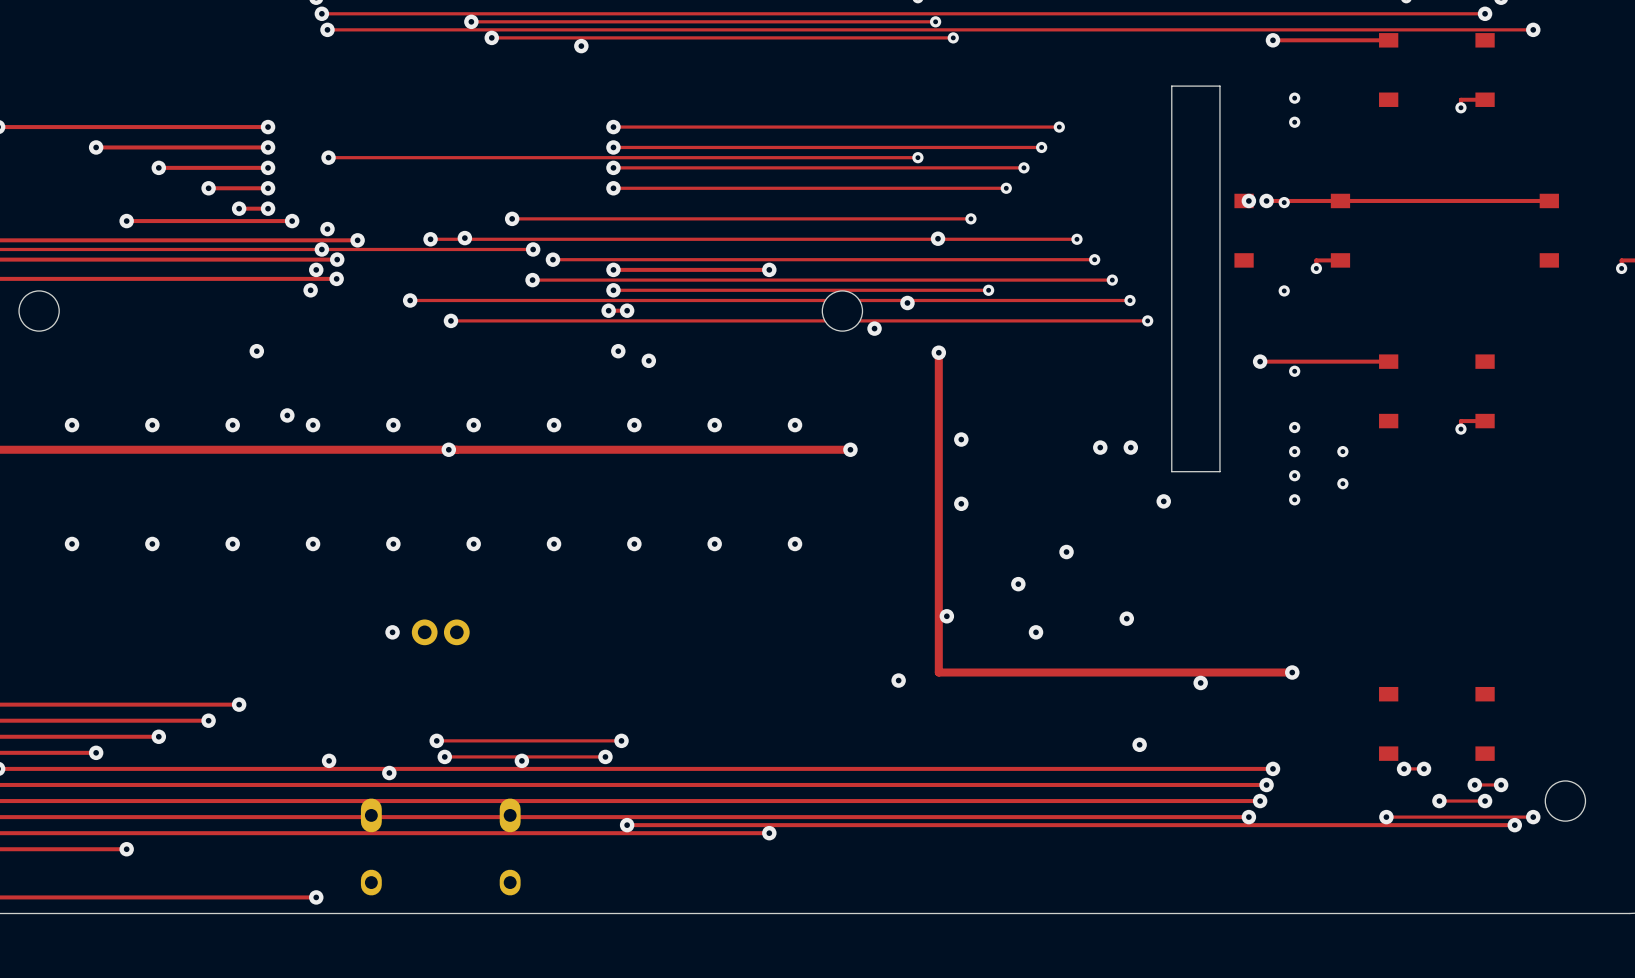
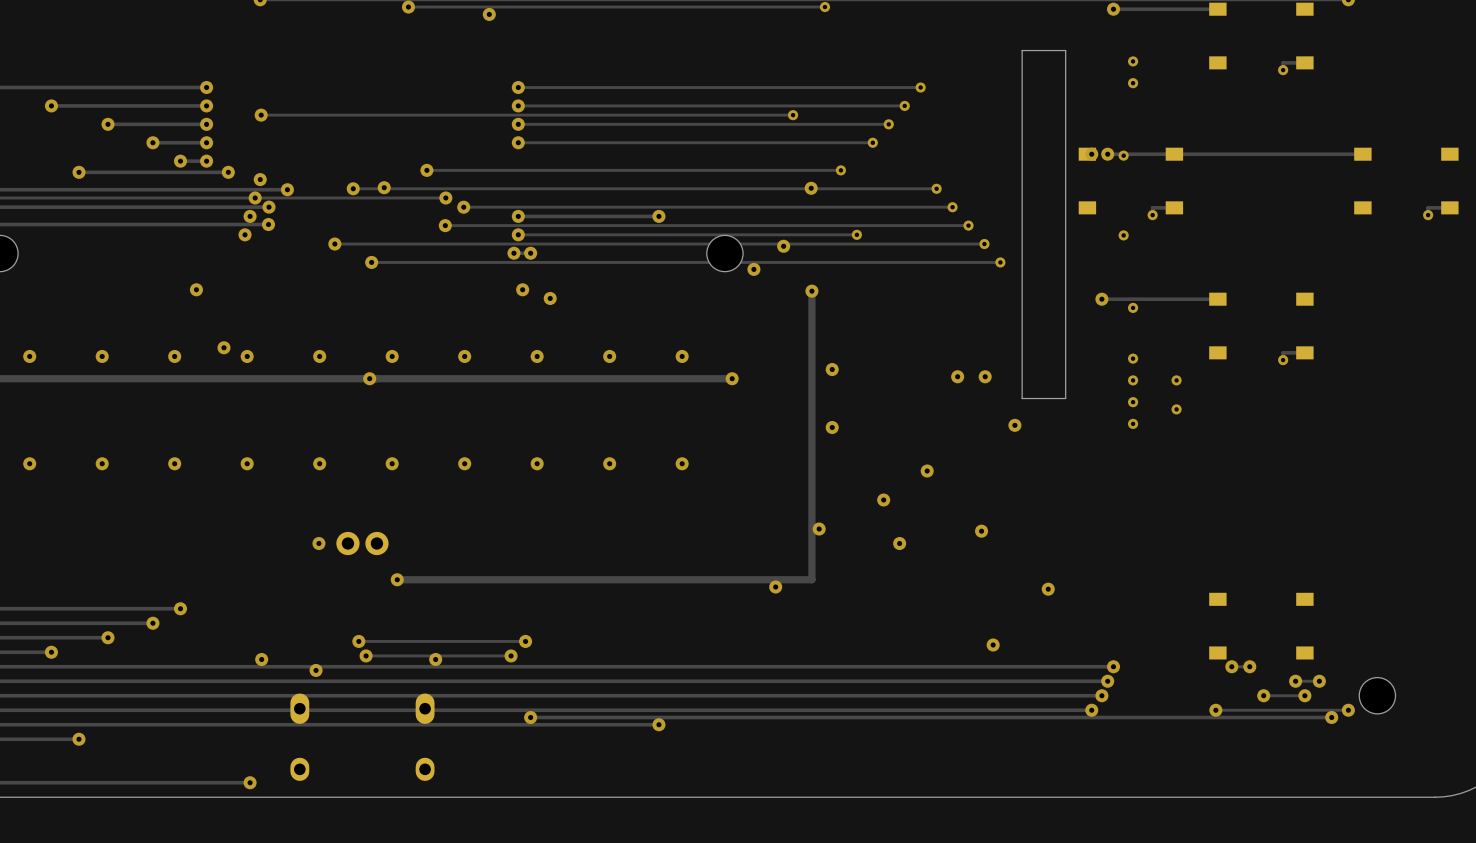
via: none -> (397, 579)
track: (938, 672) (1292, 672) -> (811, 579) (397, 579)
via: (1292, 672) -> none

